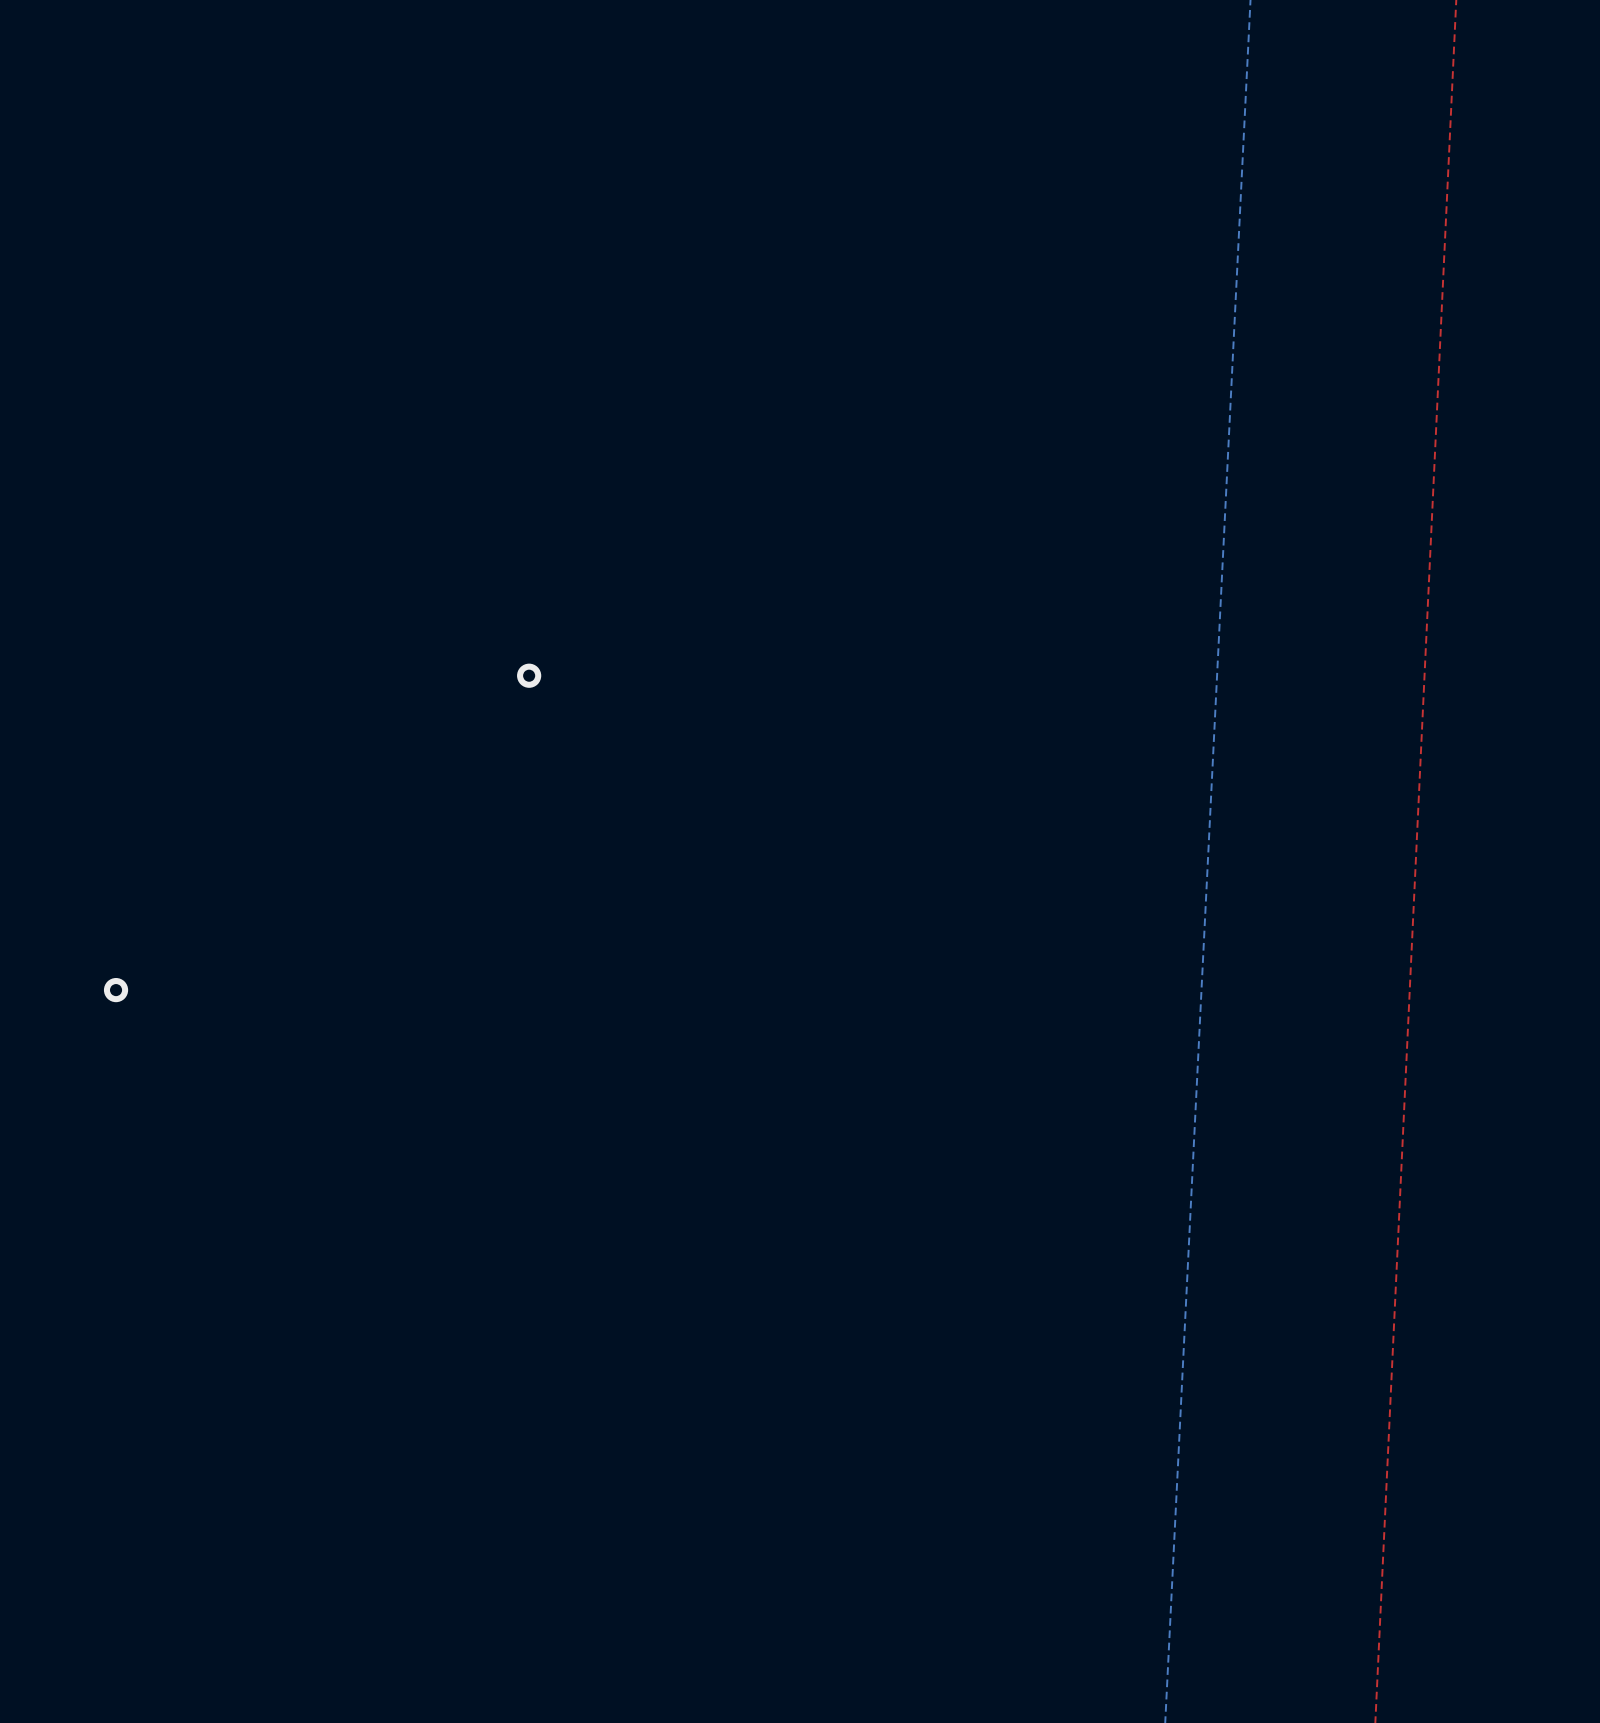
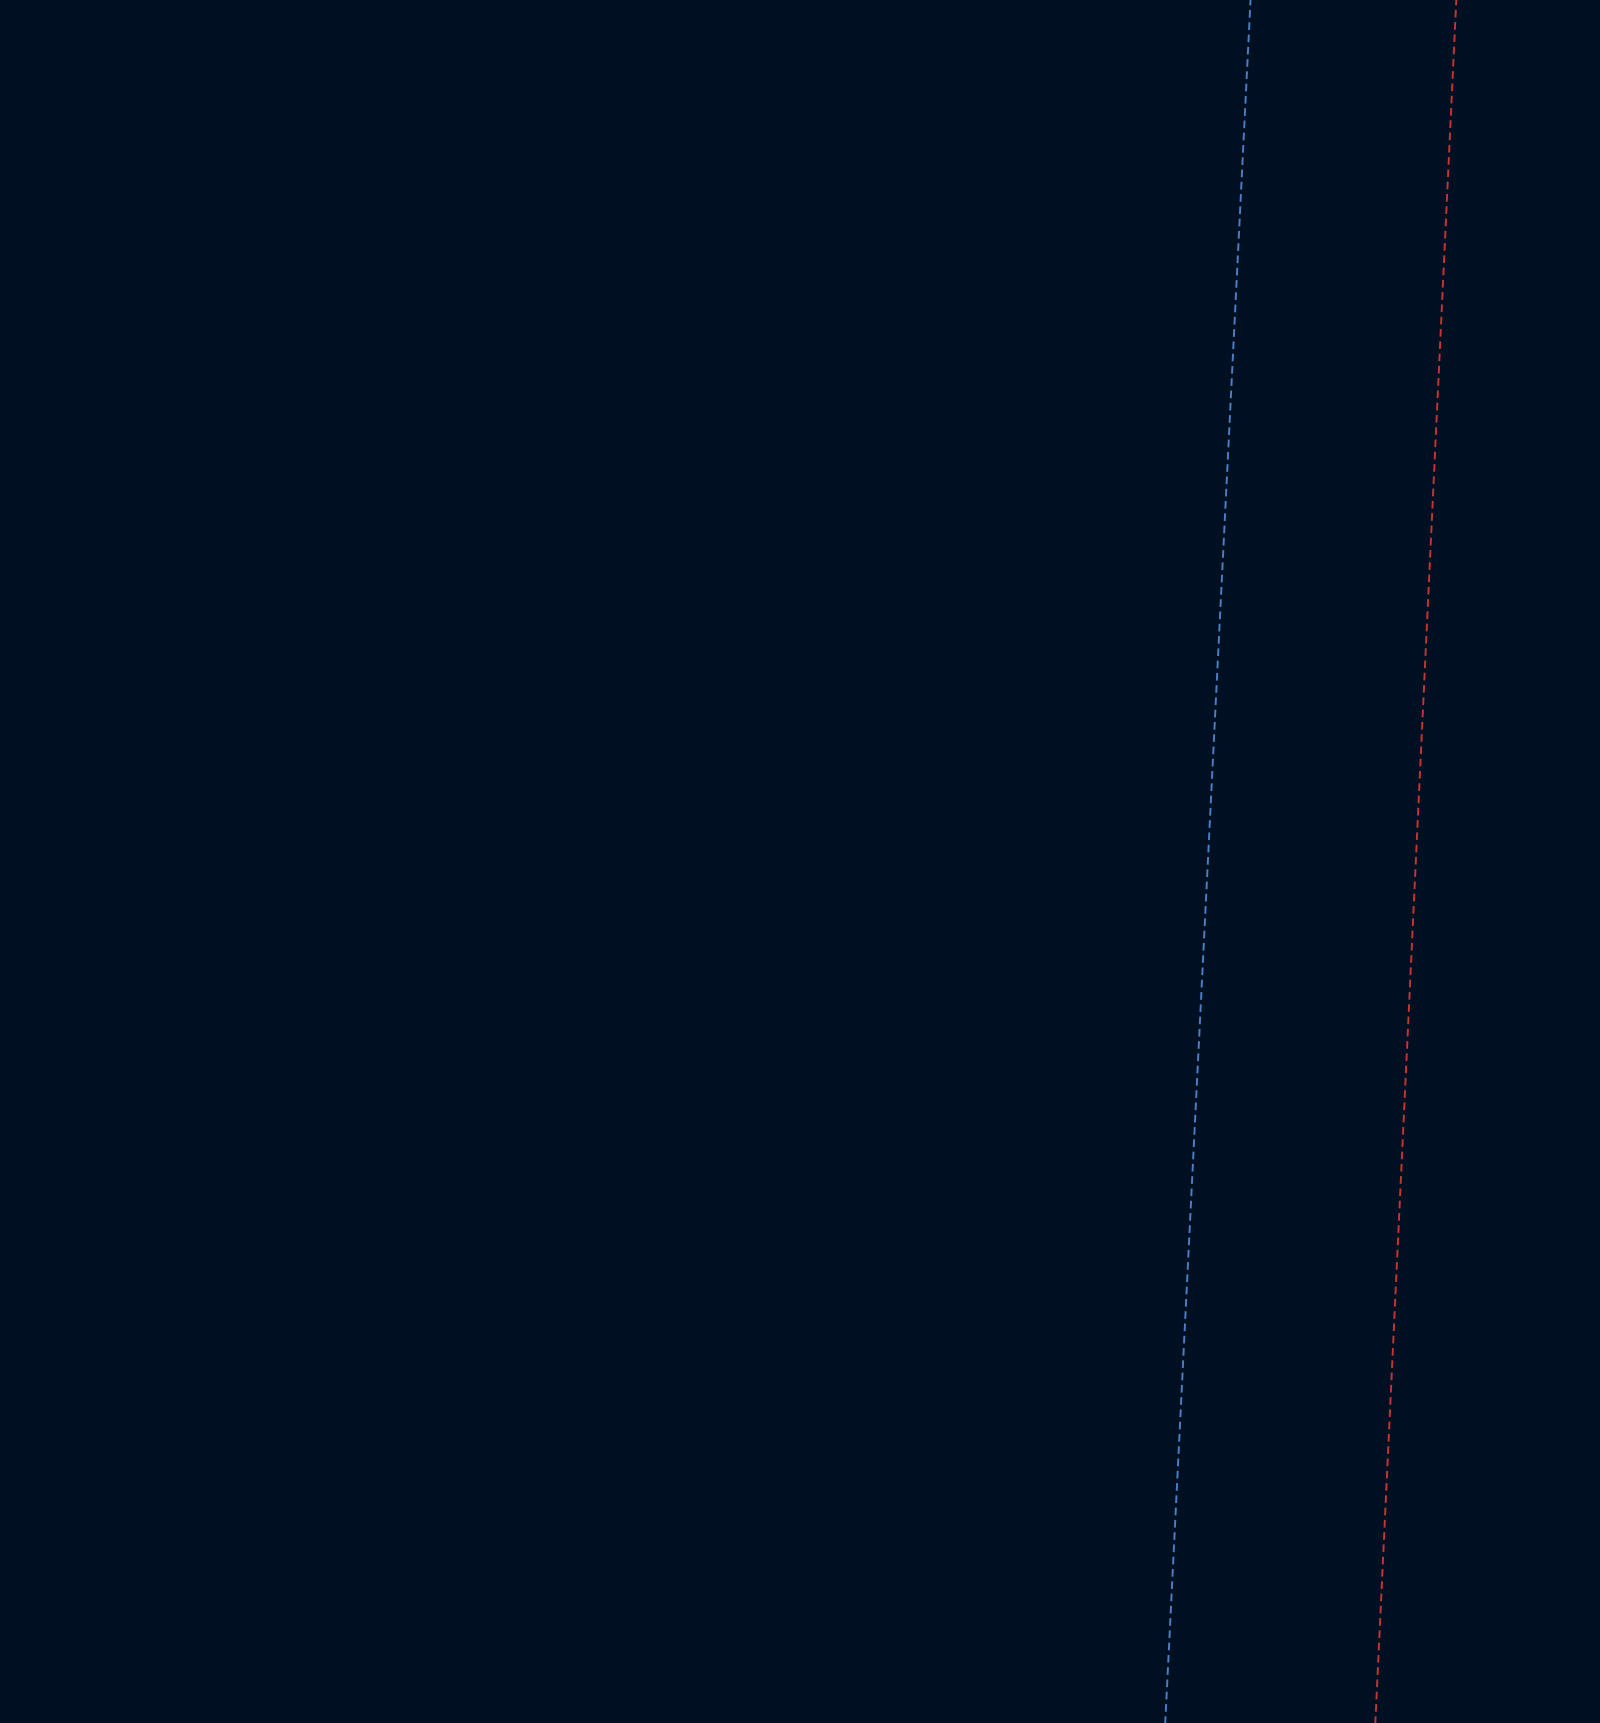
via: (529, 675) -> none
via: (116, 990) -> none

